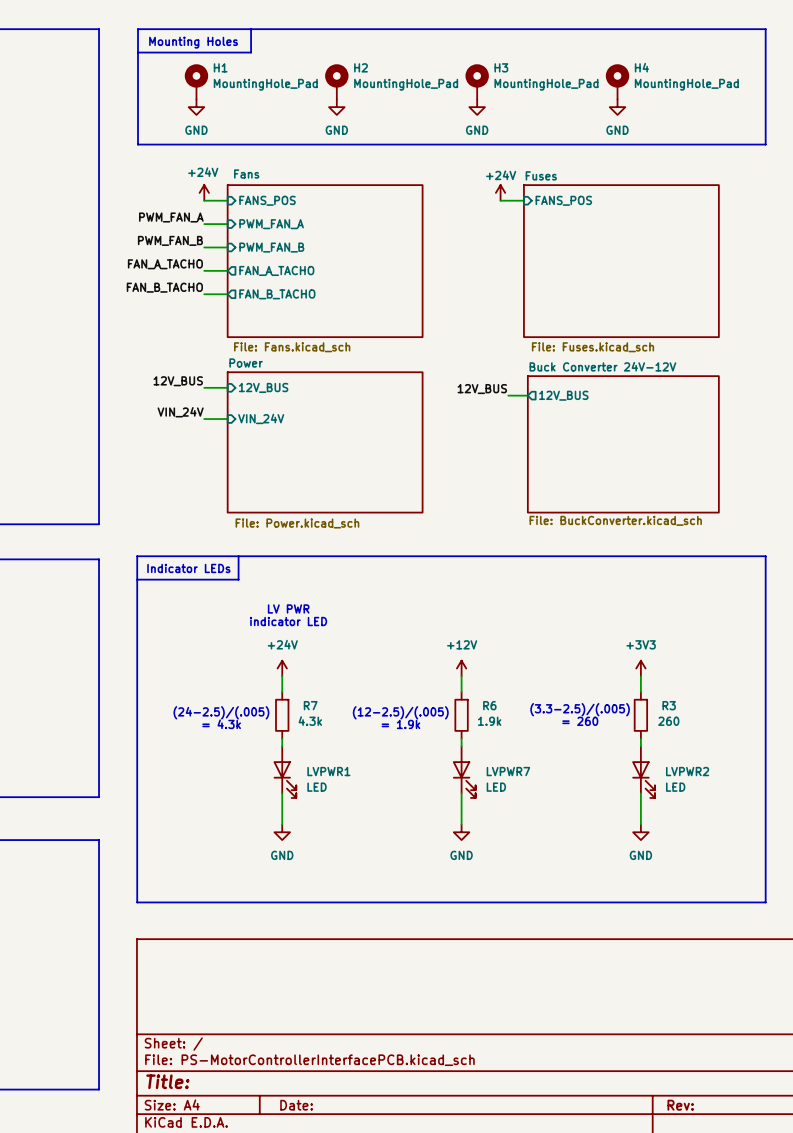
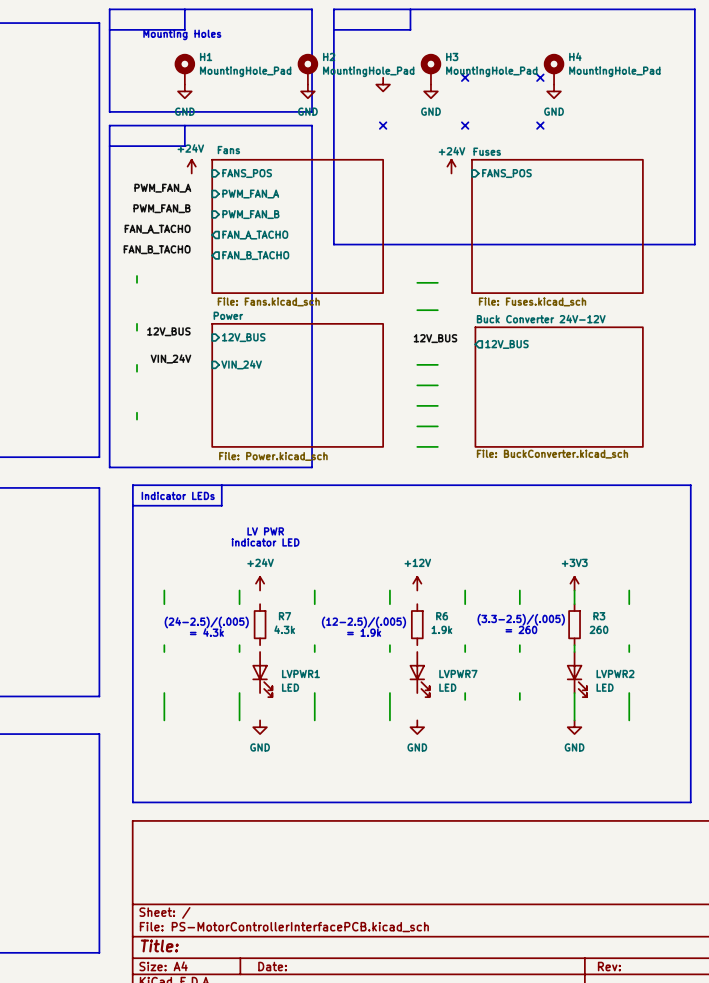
line: none -> (109, 9) (109, 111) (312, 111) (312, 9) (109, 9)
line: none -> (184, 9) (184, 29) (109, 29)
line: none -> (333, 9) (694, 9) (694, 244) (333, 244) (333, 9)
line: none -> (410, 9) (410, 29) (335, 29)
line: (137, 29) (765, 29) (765, 144) (137, 144) (137, 29) -> none
line: (251, 29) (251, 52) (137, 52) -> none
no-connect mark: none -> (465, 77)
no-connect mark: none -> (540, 77)
power symbol: none -> (383, 84)
line: none -> (109, 125) (312, 125) (312, 467) (109, 467) (109, 125)
line: none -> (184, 125) (184, 146) (109, 146)
no-connect mark: none -> (383, 125)
no-connect mark: none -> (465, 125)
no-connect mark: none -> (540, 125)
wire: (204, 200) (227, 200) -> none
wire: (500, 200) (523, 200) -> (417, 282) (437, 282)
wire: (204, 224) (227, 224) -> none
wire: (204, 247) (227, 247) -> none
wire: (204, 270) (227, 270) -> none
wire: (204, 294) (227, 294) -> none
wire: none -> (137, 276) (137, 282)
wire: none -> (417, 310) (437, 310)
wire: none -> (137, 323) (137, 330)
wire: (204, 387) (227, 387) -> none
wire: (508, 395) (527, 395) -> none
wire: none -> (137, 364) (137, 371)
wire: (204, 419) (227, 419) -> none
wire: none -> (417, 364) (437, 364)
wire: none -> (417, 385) (437, 385)
wire: none -> (417, 405) (437, 405)
wire: none -> (137, 412) (137, 419)
wire: none -> (417, 426) (437, 426)
wire: none -> (417, 446) (437, 446)
line: (765, 556) (765, 902) (137, 902) -> (683, 485) (690, 485) (690, 802) (132, 802) (132, 788)
wire: none -> (164, 590) (164, 604)
wire: (282, 676) (282, 691) -> (239, 590) (239, 604)
wire: none -> (314, 590) (314, 604)
wire: (461, 676) (461, 691) -> (389, 590) (389, 604)
wire: none -> (465, 590) (465, 604)
wire: none -> (519, 590) (519, 604)
wire: none -> (629, 590) (629, 604)
wire: none -> (164, 645) (164, 652)
wire: (282, 738) (282, 746) -> (239, 645) (239, 652)
wire: none -> (314, 645) (314, 652)
wire: (461, 738) (461, 746) -> (389, 645) (389, 652)
wire: none -> (465, 645) (465, 652)
wire: none -> (519, 645) (519, 652)
wire: none -> (629, 645) (629, 652)
wire: none -> (164, 693) (164, 720)
wire: (282, 793) (282, 824) -> (239, 693) (239, 720)
wire: none -> (314, 693) (314, 720)
wire: (461, 793) (461, 824) -> (389, 693) (389, 720)
wire: none -> (465, 693) (465, 699)
wire: none -> (519, 693) (519, 699)
wire: none -> (629, 693) (629, 720)

